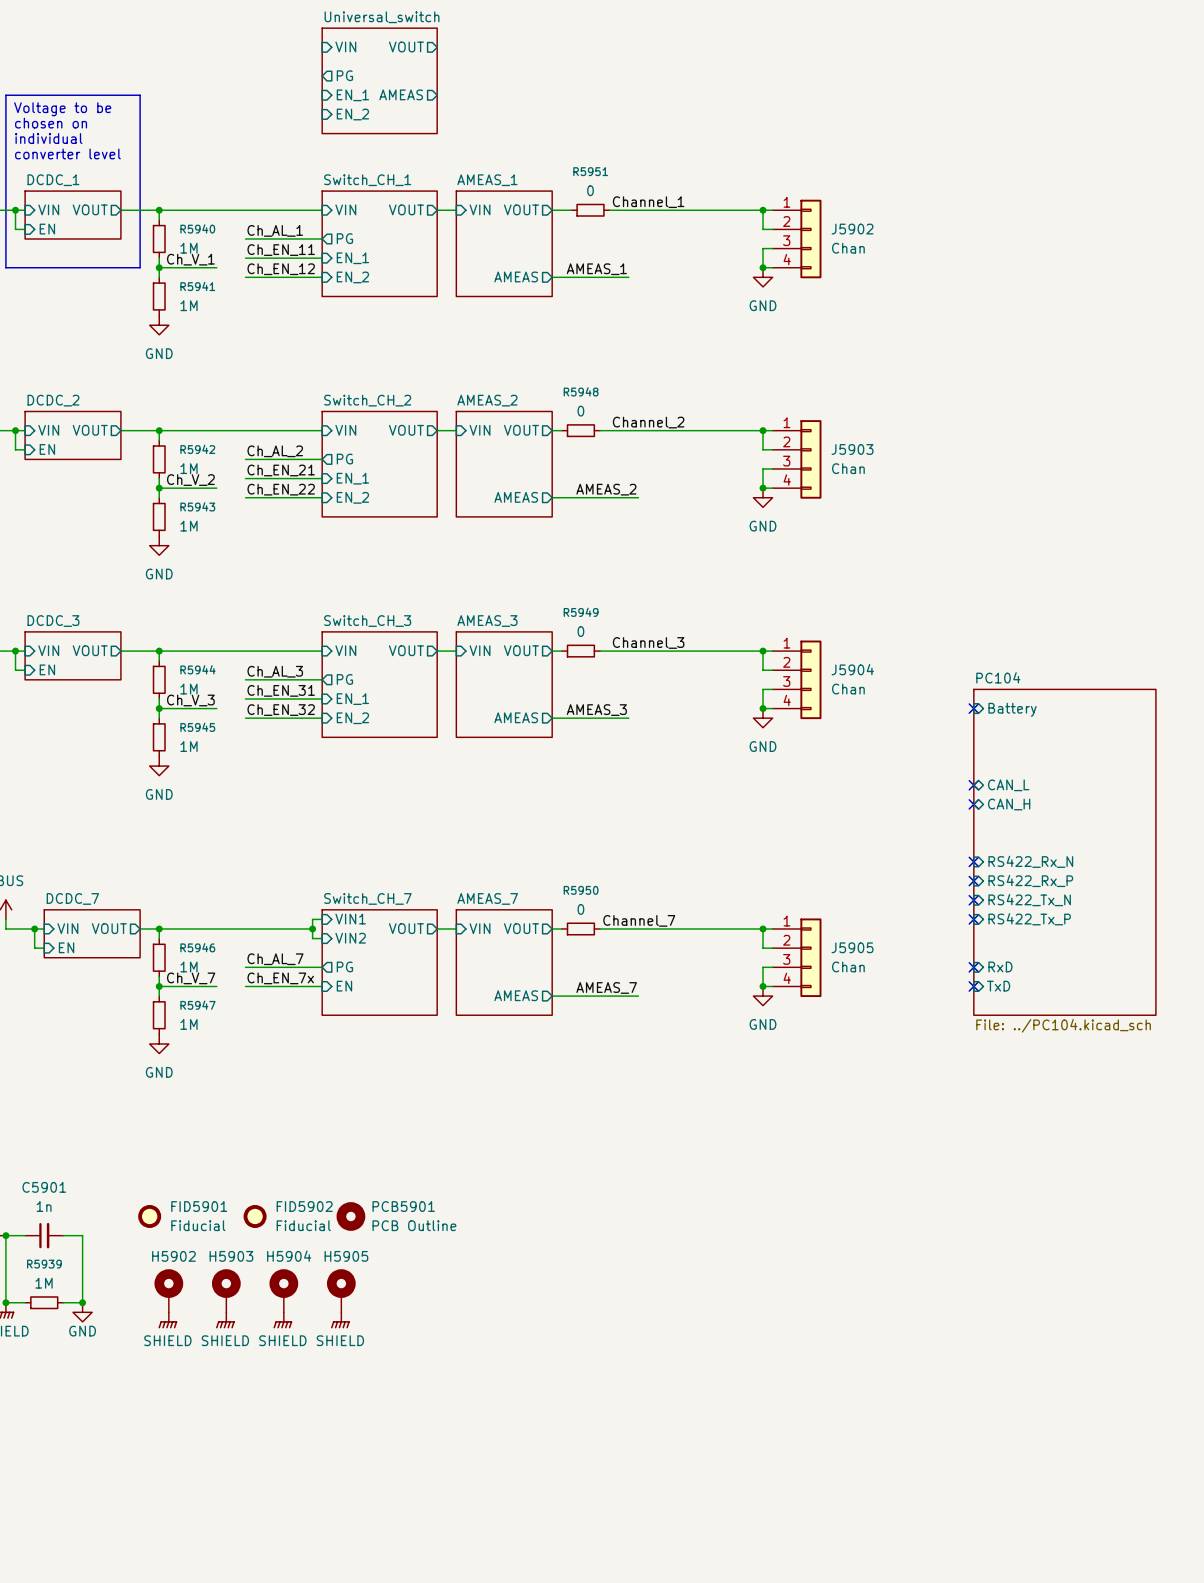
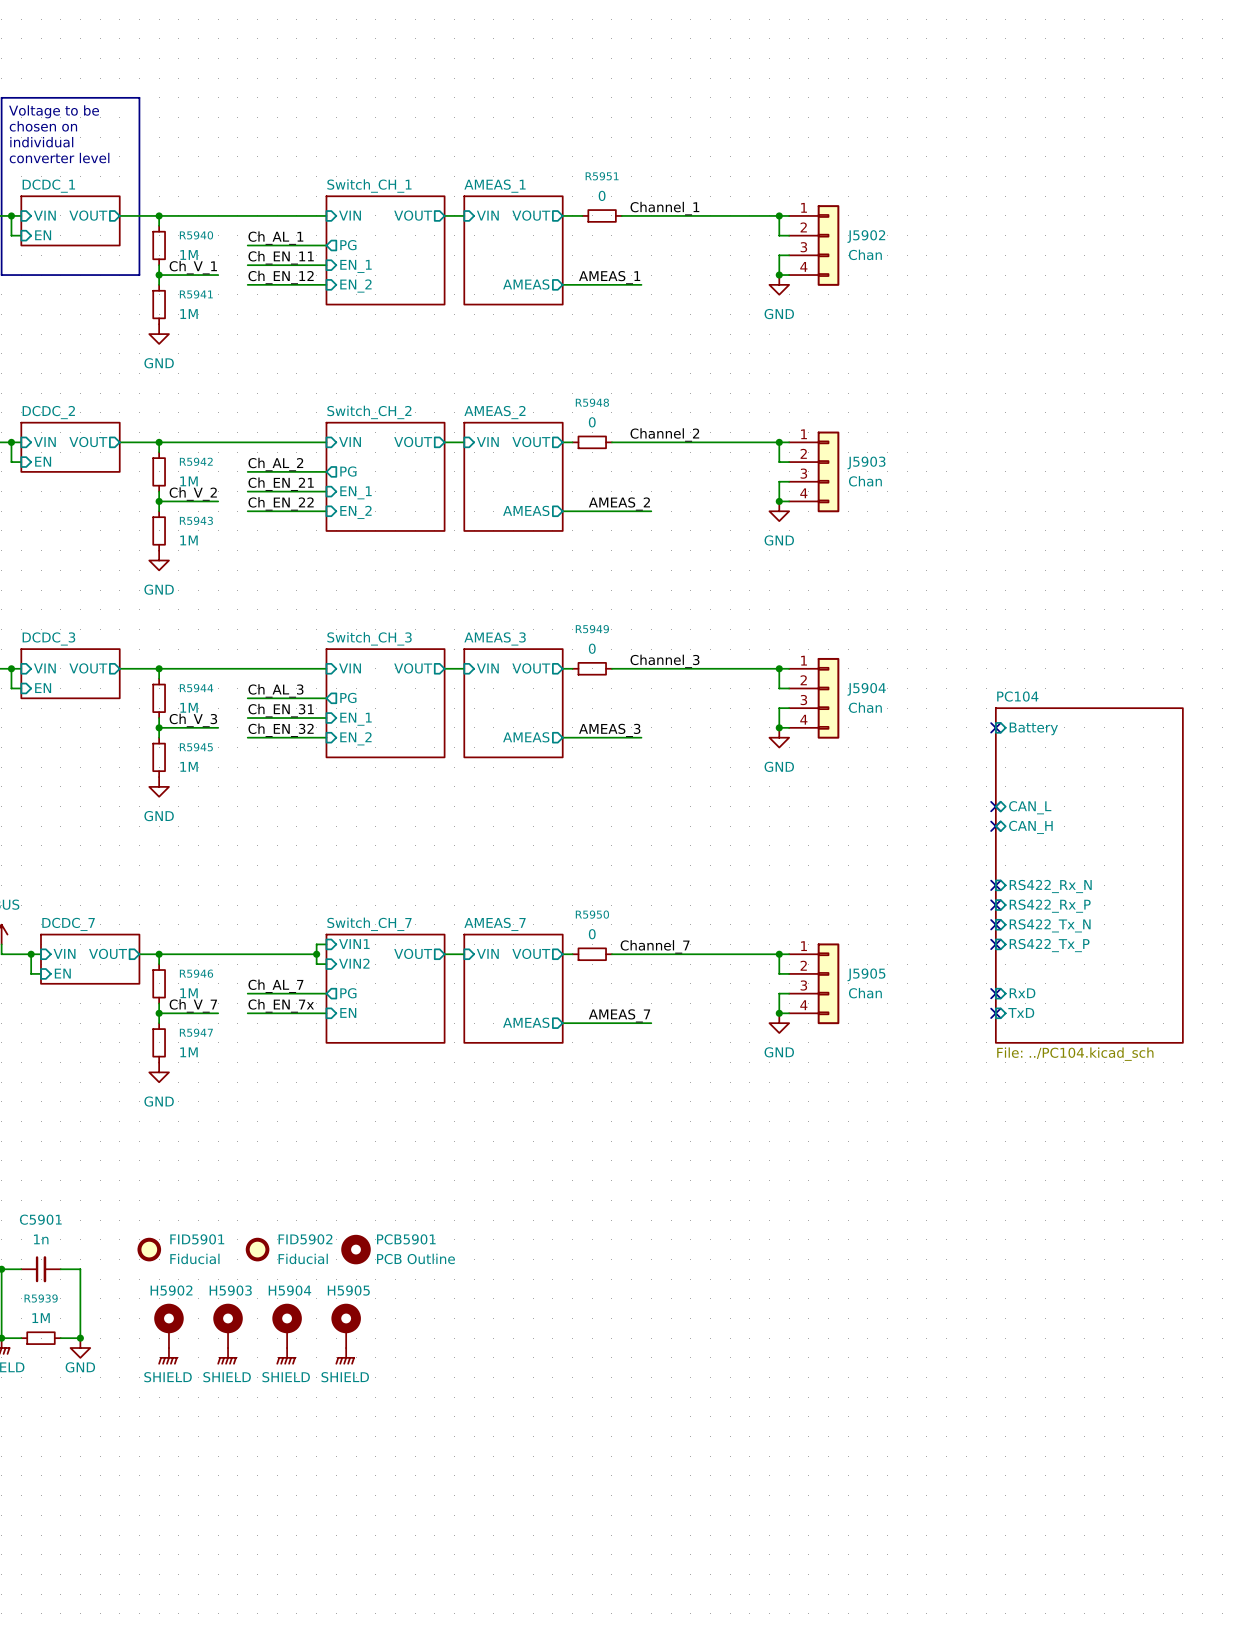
sheet pin: VIN (345, 46) -> none
sheet pin: VOUT (406, 46) -> none
sheet pin: PG (344, 75) -> none
sheet Universal_switch: (379, 80) -> none
sheet pin: AMEAS (401, 94) -> none
sheet pin: EN_1 (352, 95) -> none
sheet pin: EN_2 (352, 114) -> none

